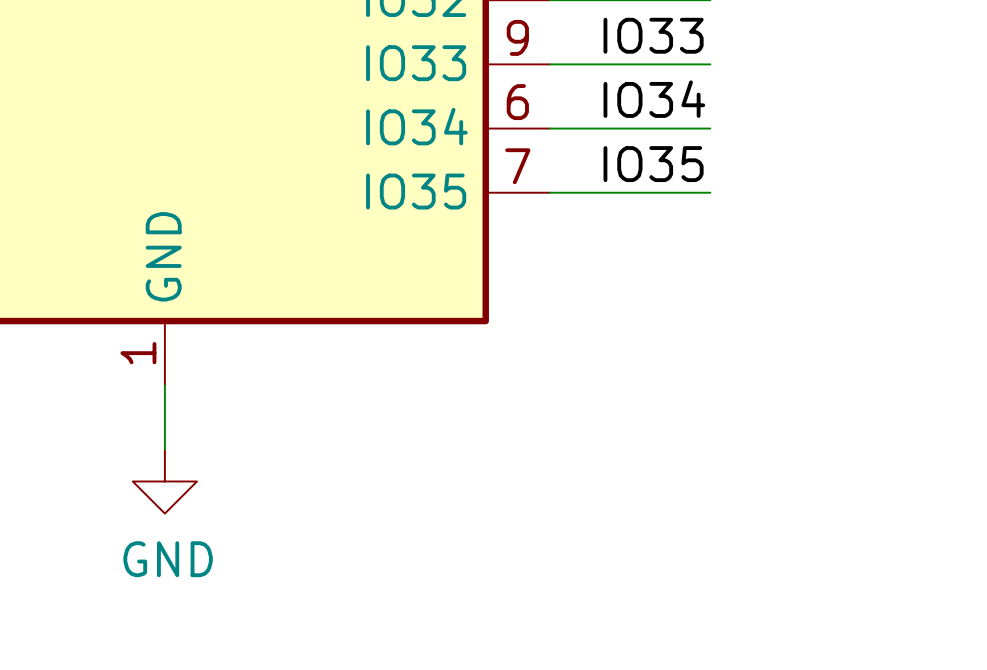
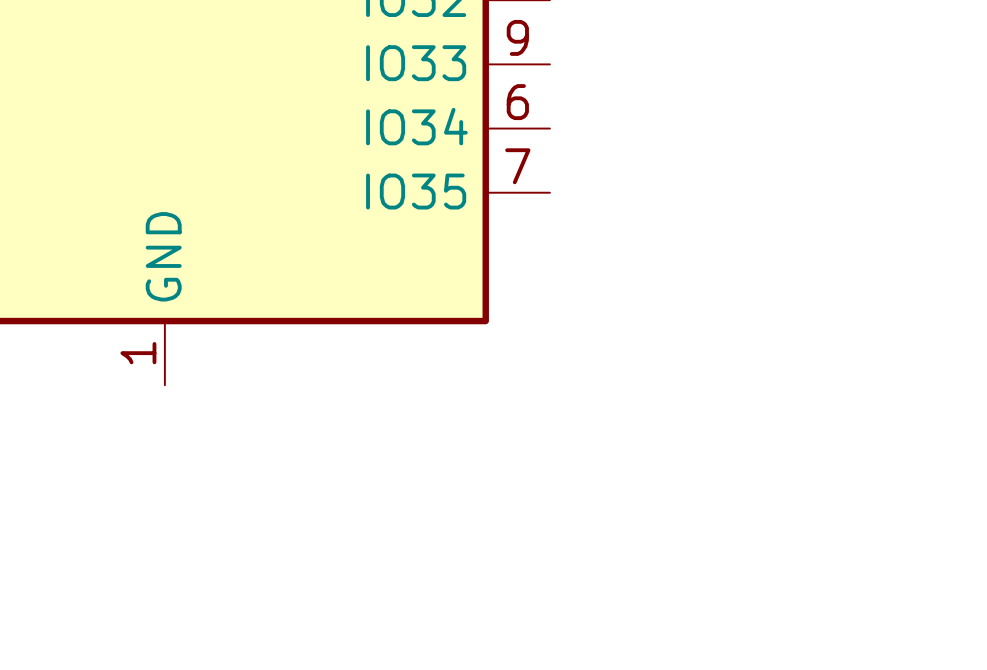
wire: (549, 0) (710, 0) -> none
label: IO33 (653, 35) -> none
wire: (549, 64) (710, 64) -> none
label: IO34 (654, 99) -> none
wire: (549, 128) (710, 128) -> none
label: IO35 (653, 164) -> none
wire: (549, 192) (710, 192) -> none
wire: (164, 385) (164, 449) -> none
power symbol: GND (164, 481) -> none

